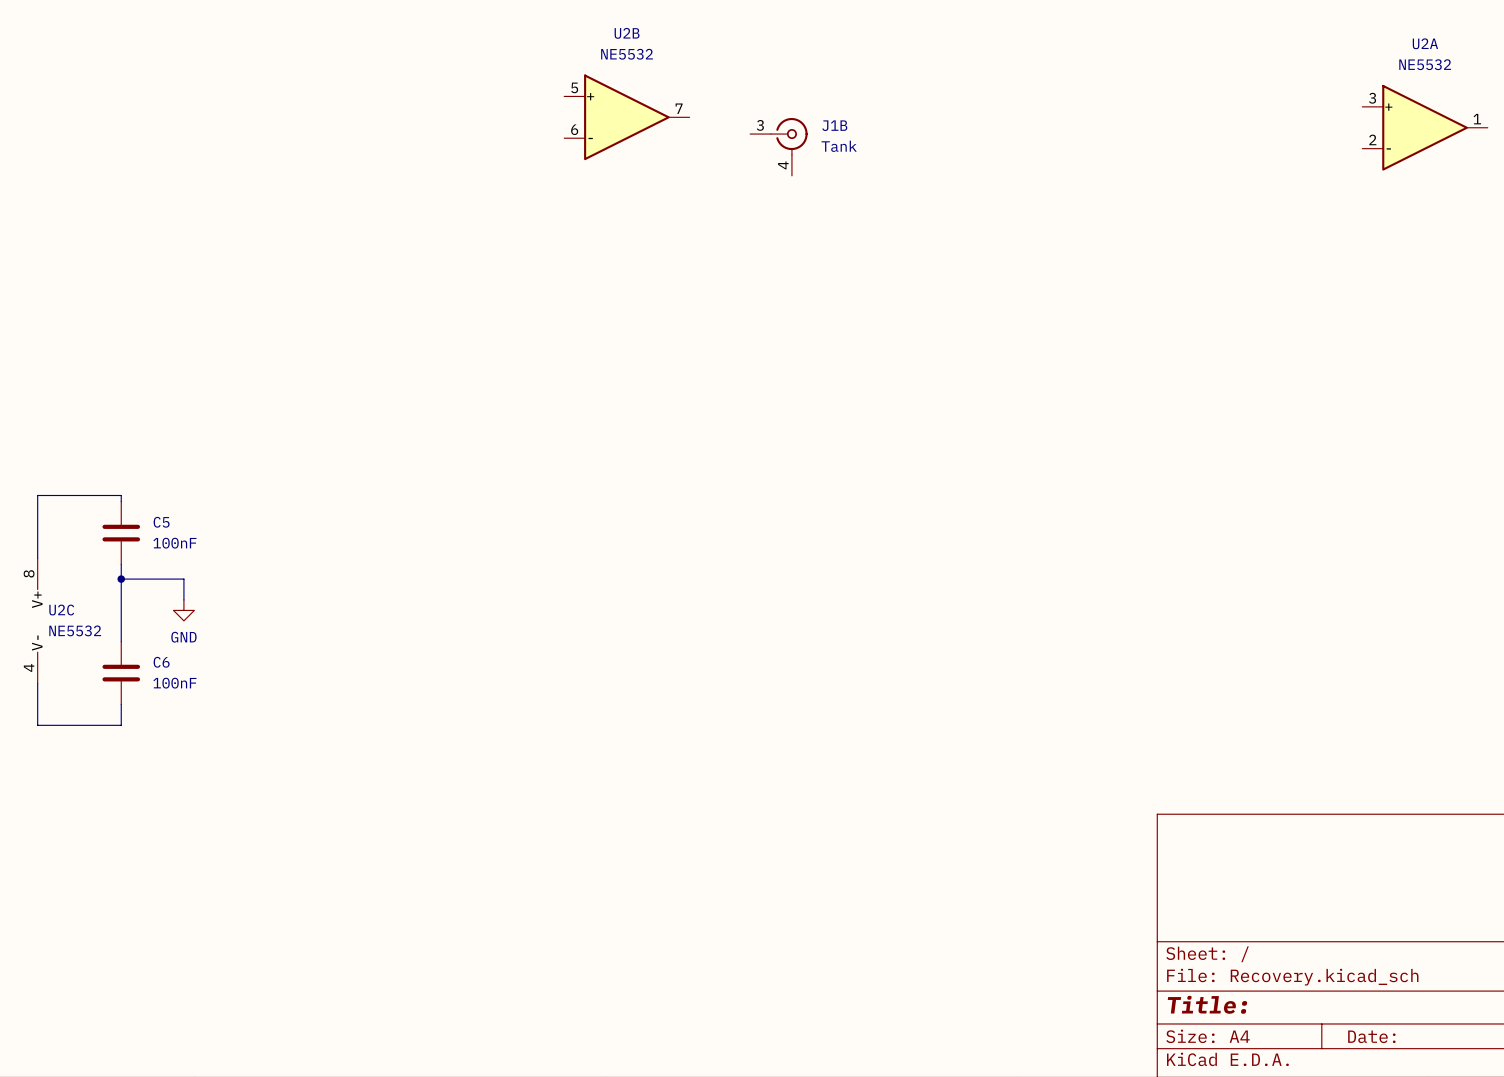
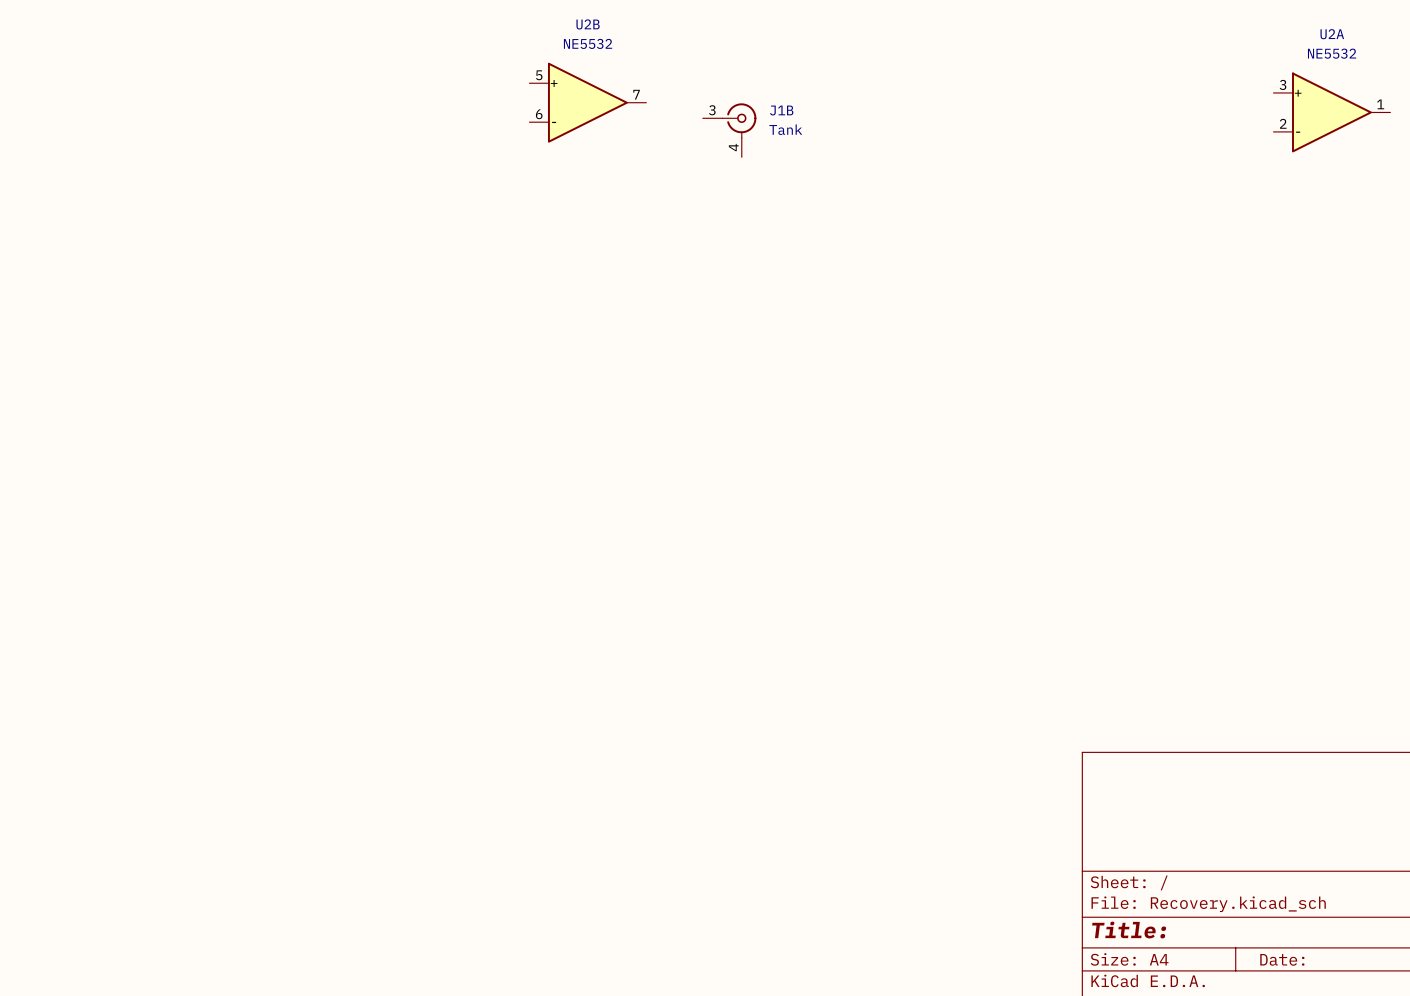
wire: (121, 501) (121, 495) (37, 495) (37, 558) -> none
C5: 100nF (121, 533) -> none
wire: (121, 564) (121, 641) -> none
wire: (121, 579) (183, 579) (183, 599) -> none
junction: (121, 579) -> none
power symbol: GND (183, 610) -> none
U2C: NE5532 (37, 620) -> none
C6: 100nF (121, 673) -> none
wire: (37, 683) (37, 725) (121, 725) (121, 704) -> none

